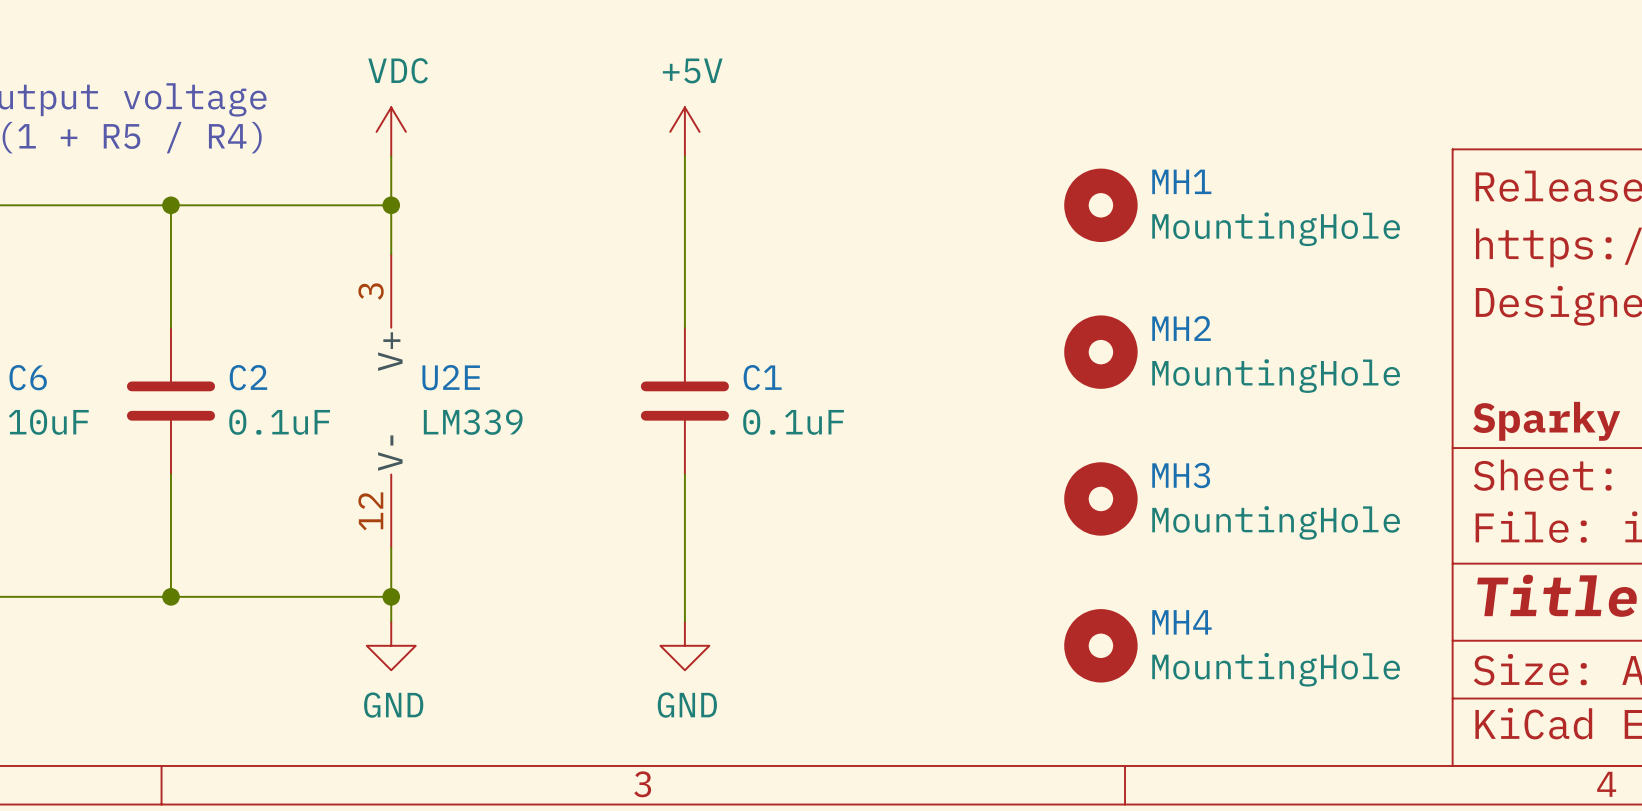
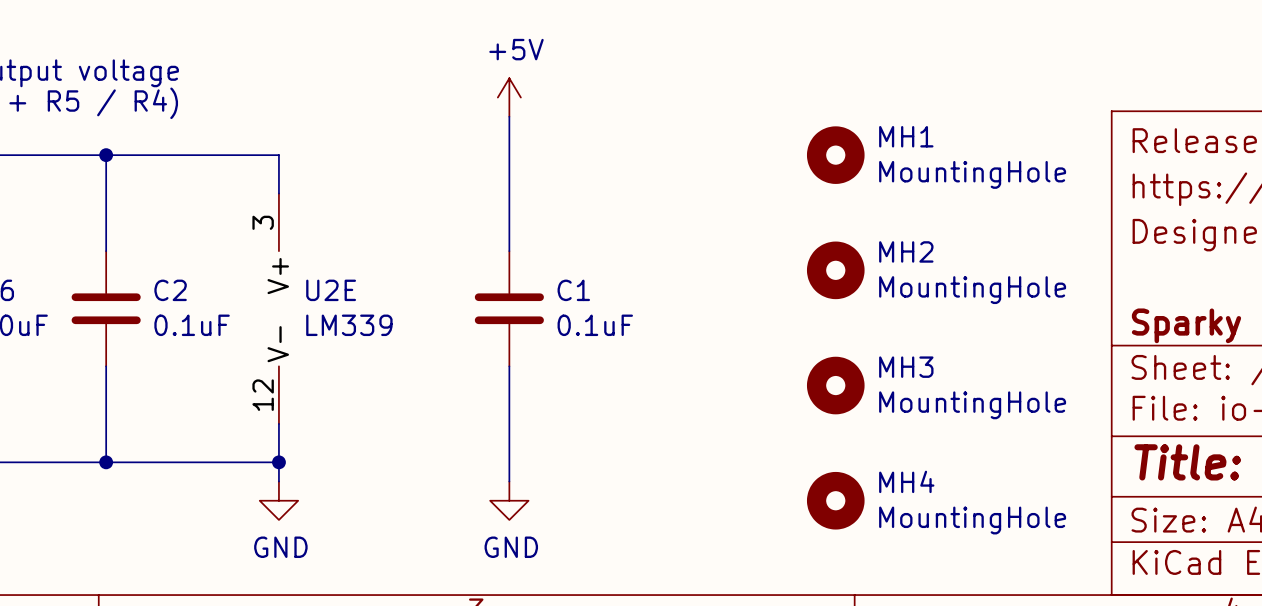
power symbol: VDC (391, 131) -> none
wire: (391, 156) (391, 205) -> none
junction: (391, 205) -> none

